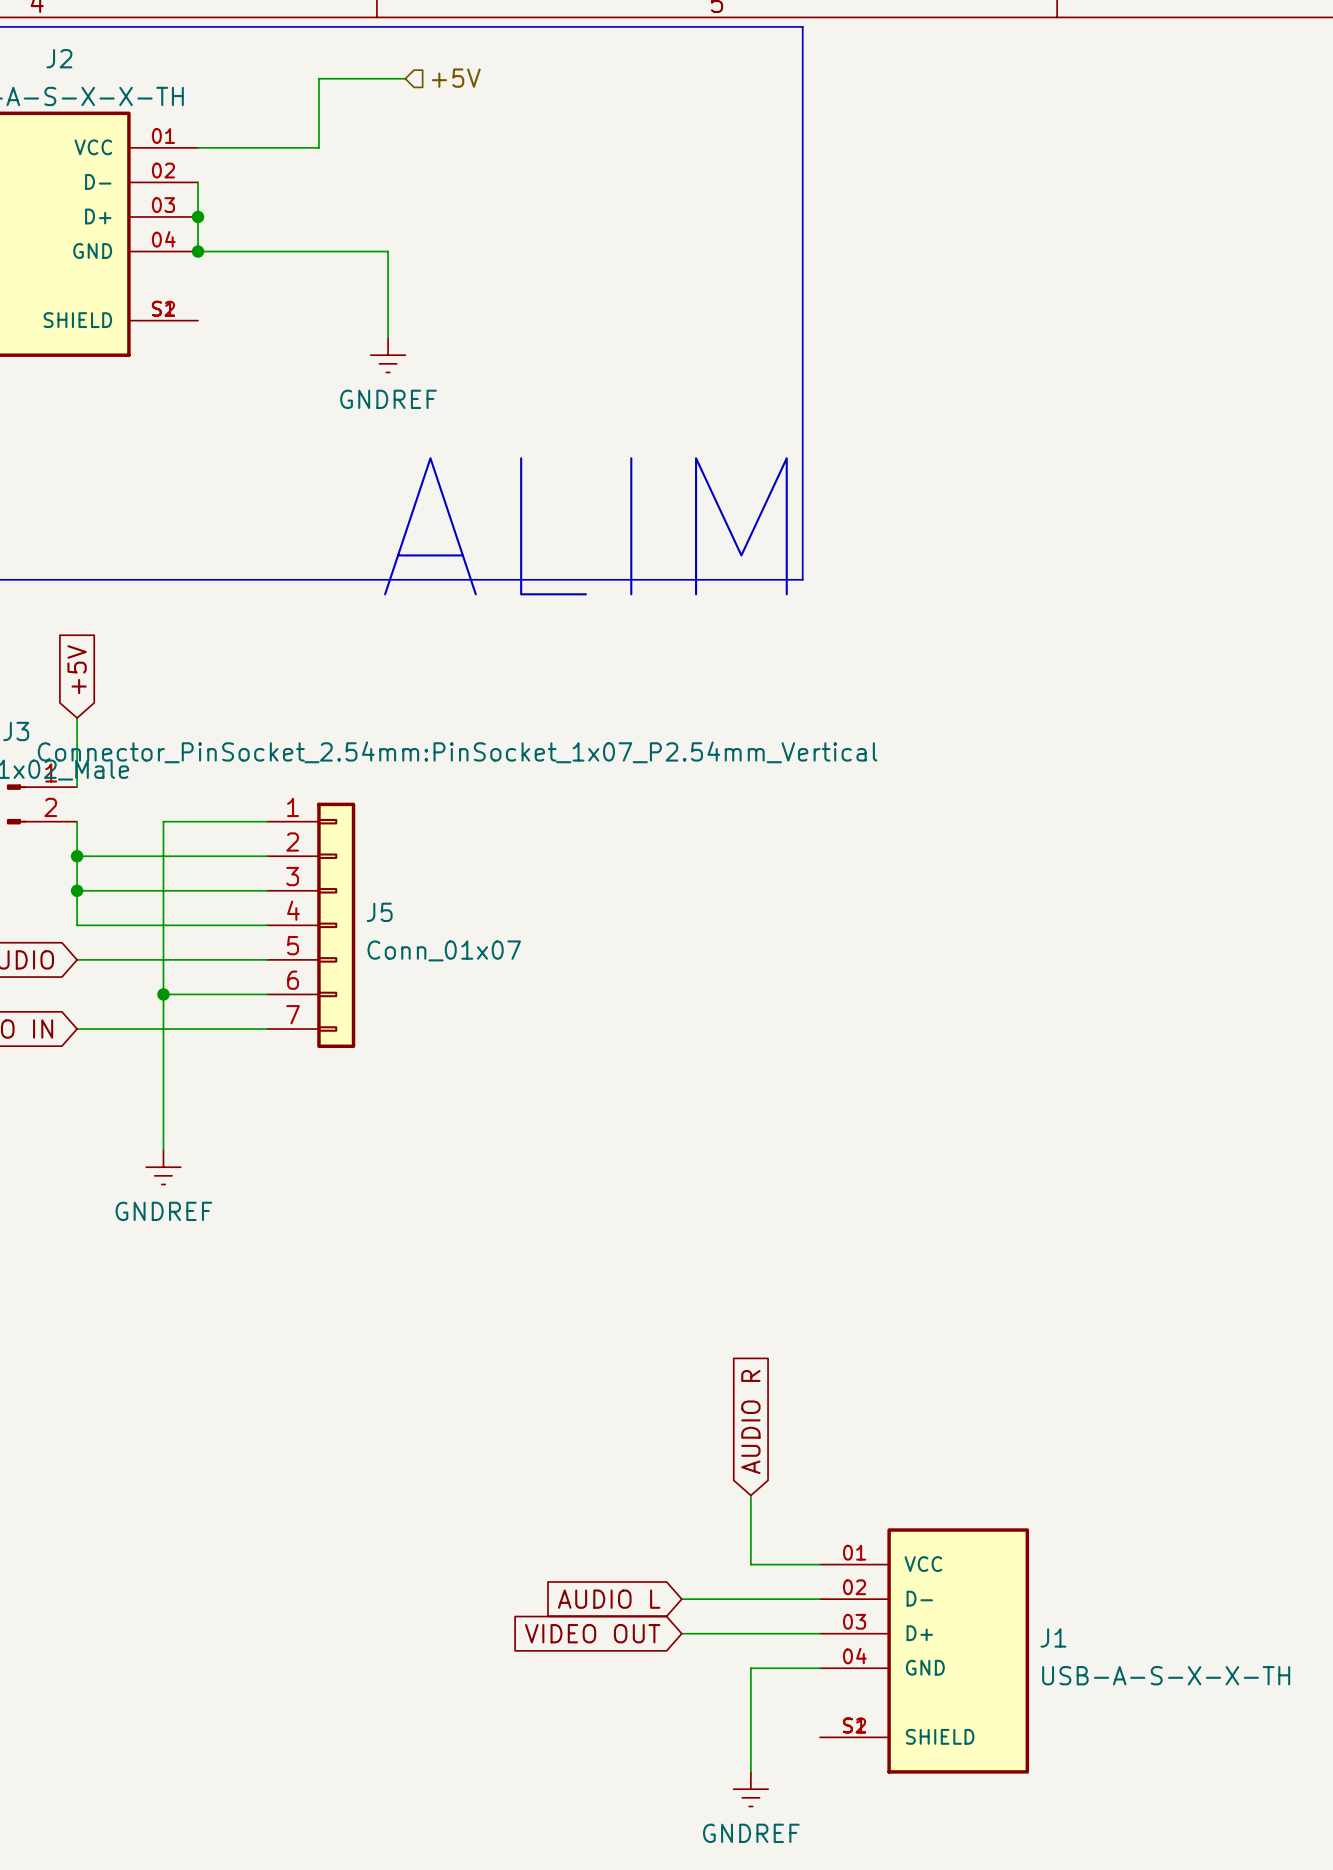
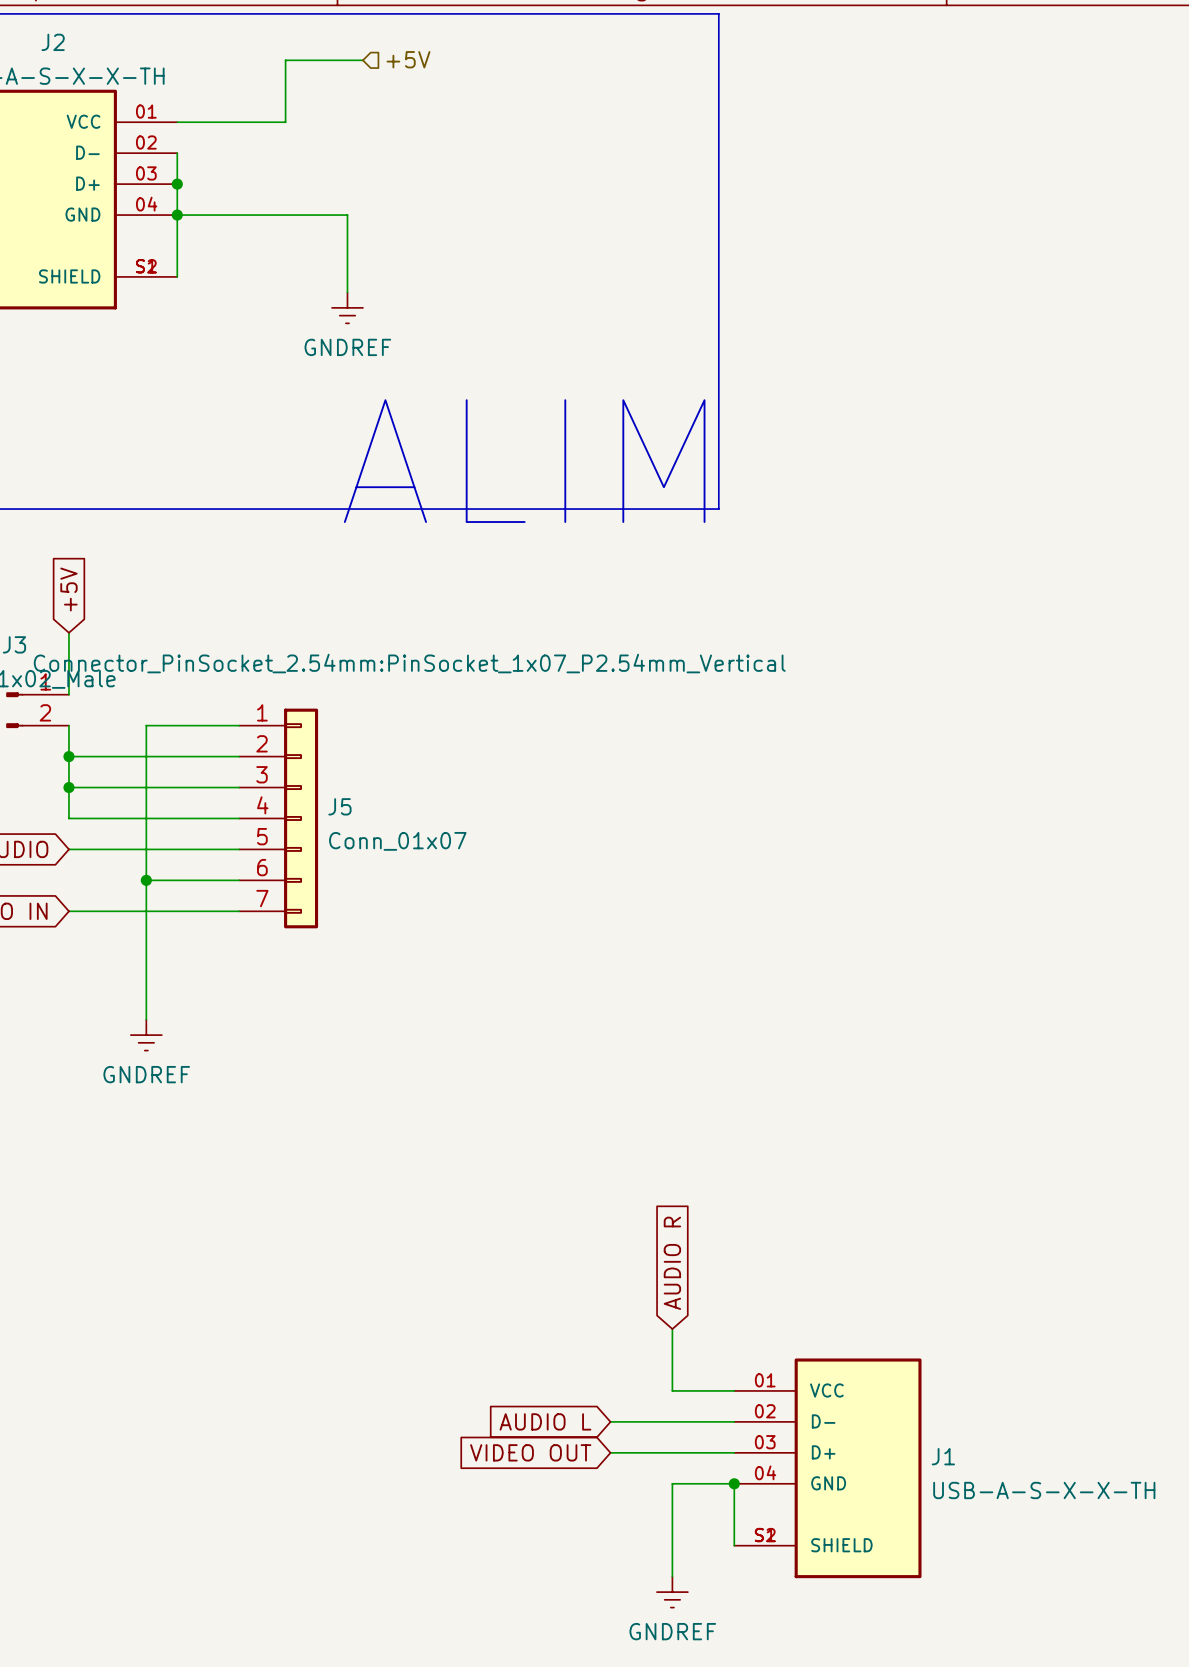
wire: none -> (177, 215) (177, 276)
wire: none -> (734, 1483) (734, 1545)
junction: none -> (734, 1483)

